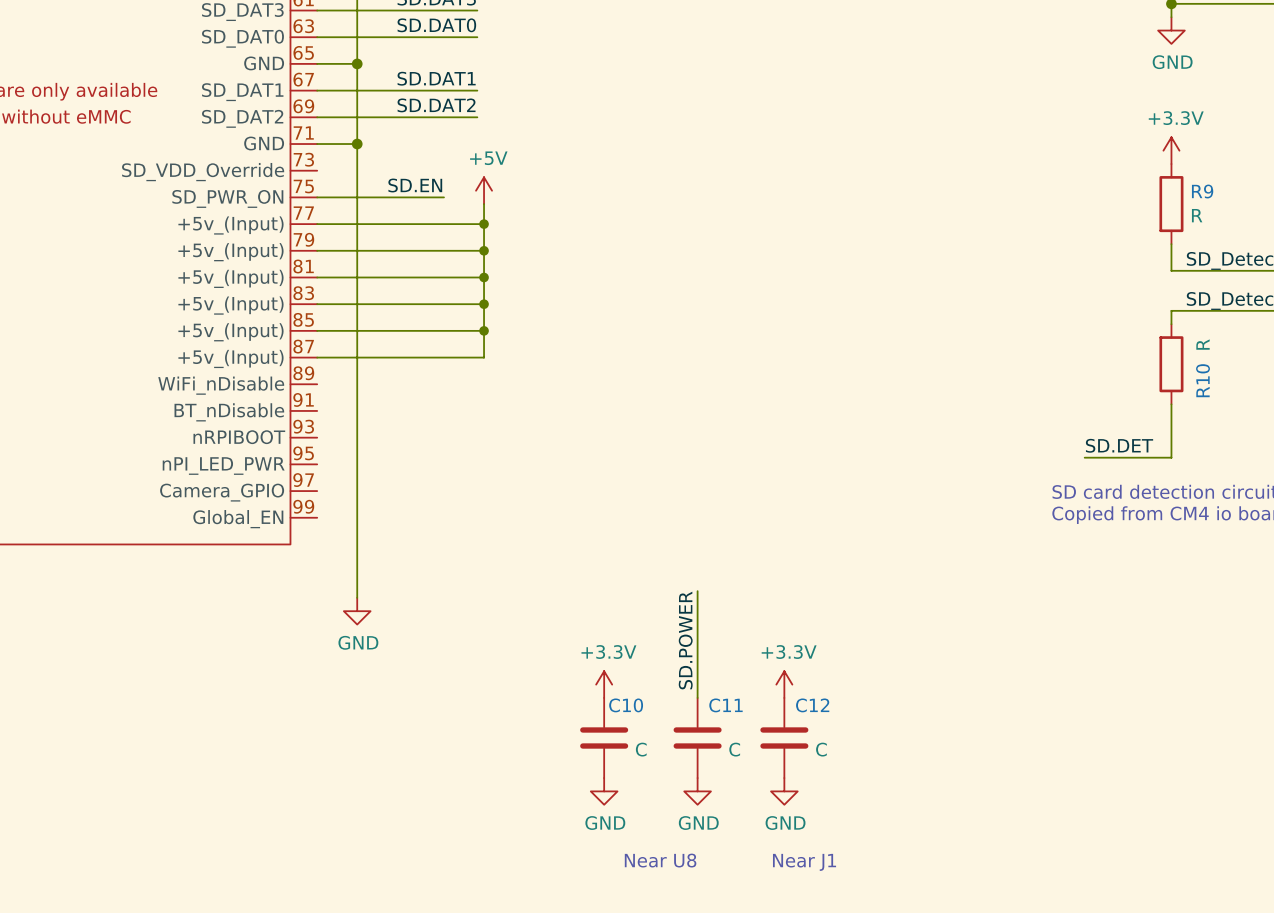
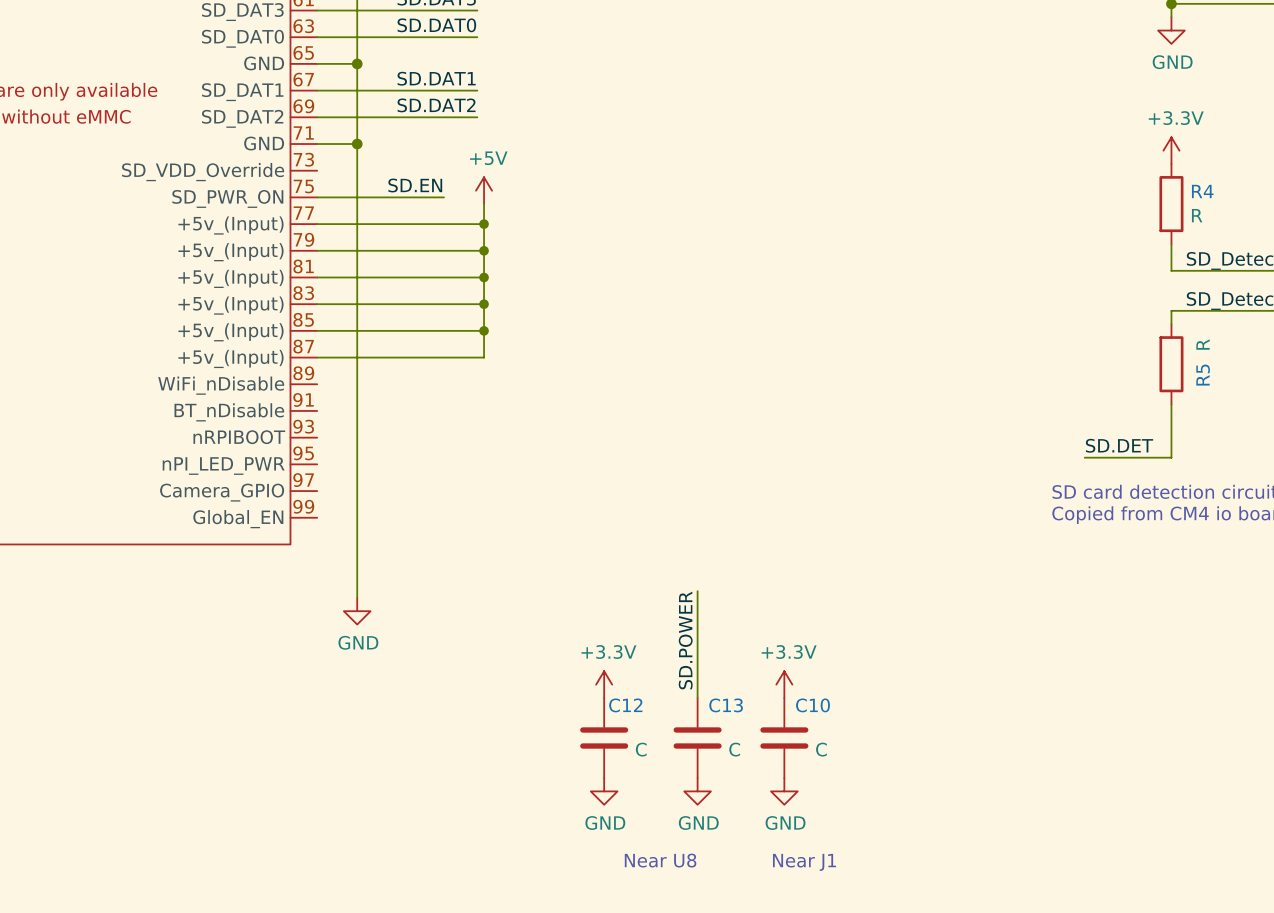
R9 name: R9 (1202, 191) -> R4 (1202, 191)
R10 name: R10 (1203, 380) -> R5 (1203, 375)
C10 name: C10 (626, 705) -> C12 (625, 705)
C11 name: C11 (725, 705) -> C13 (726, 705)
C12 name: C12 (812, 705) -> C10 (812, 705)

